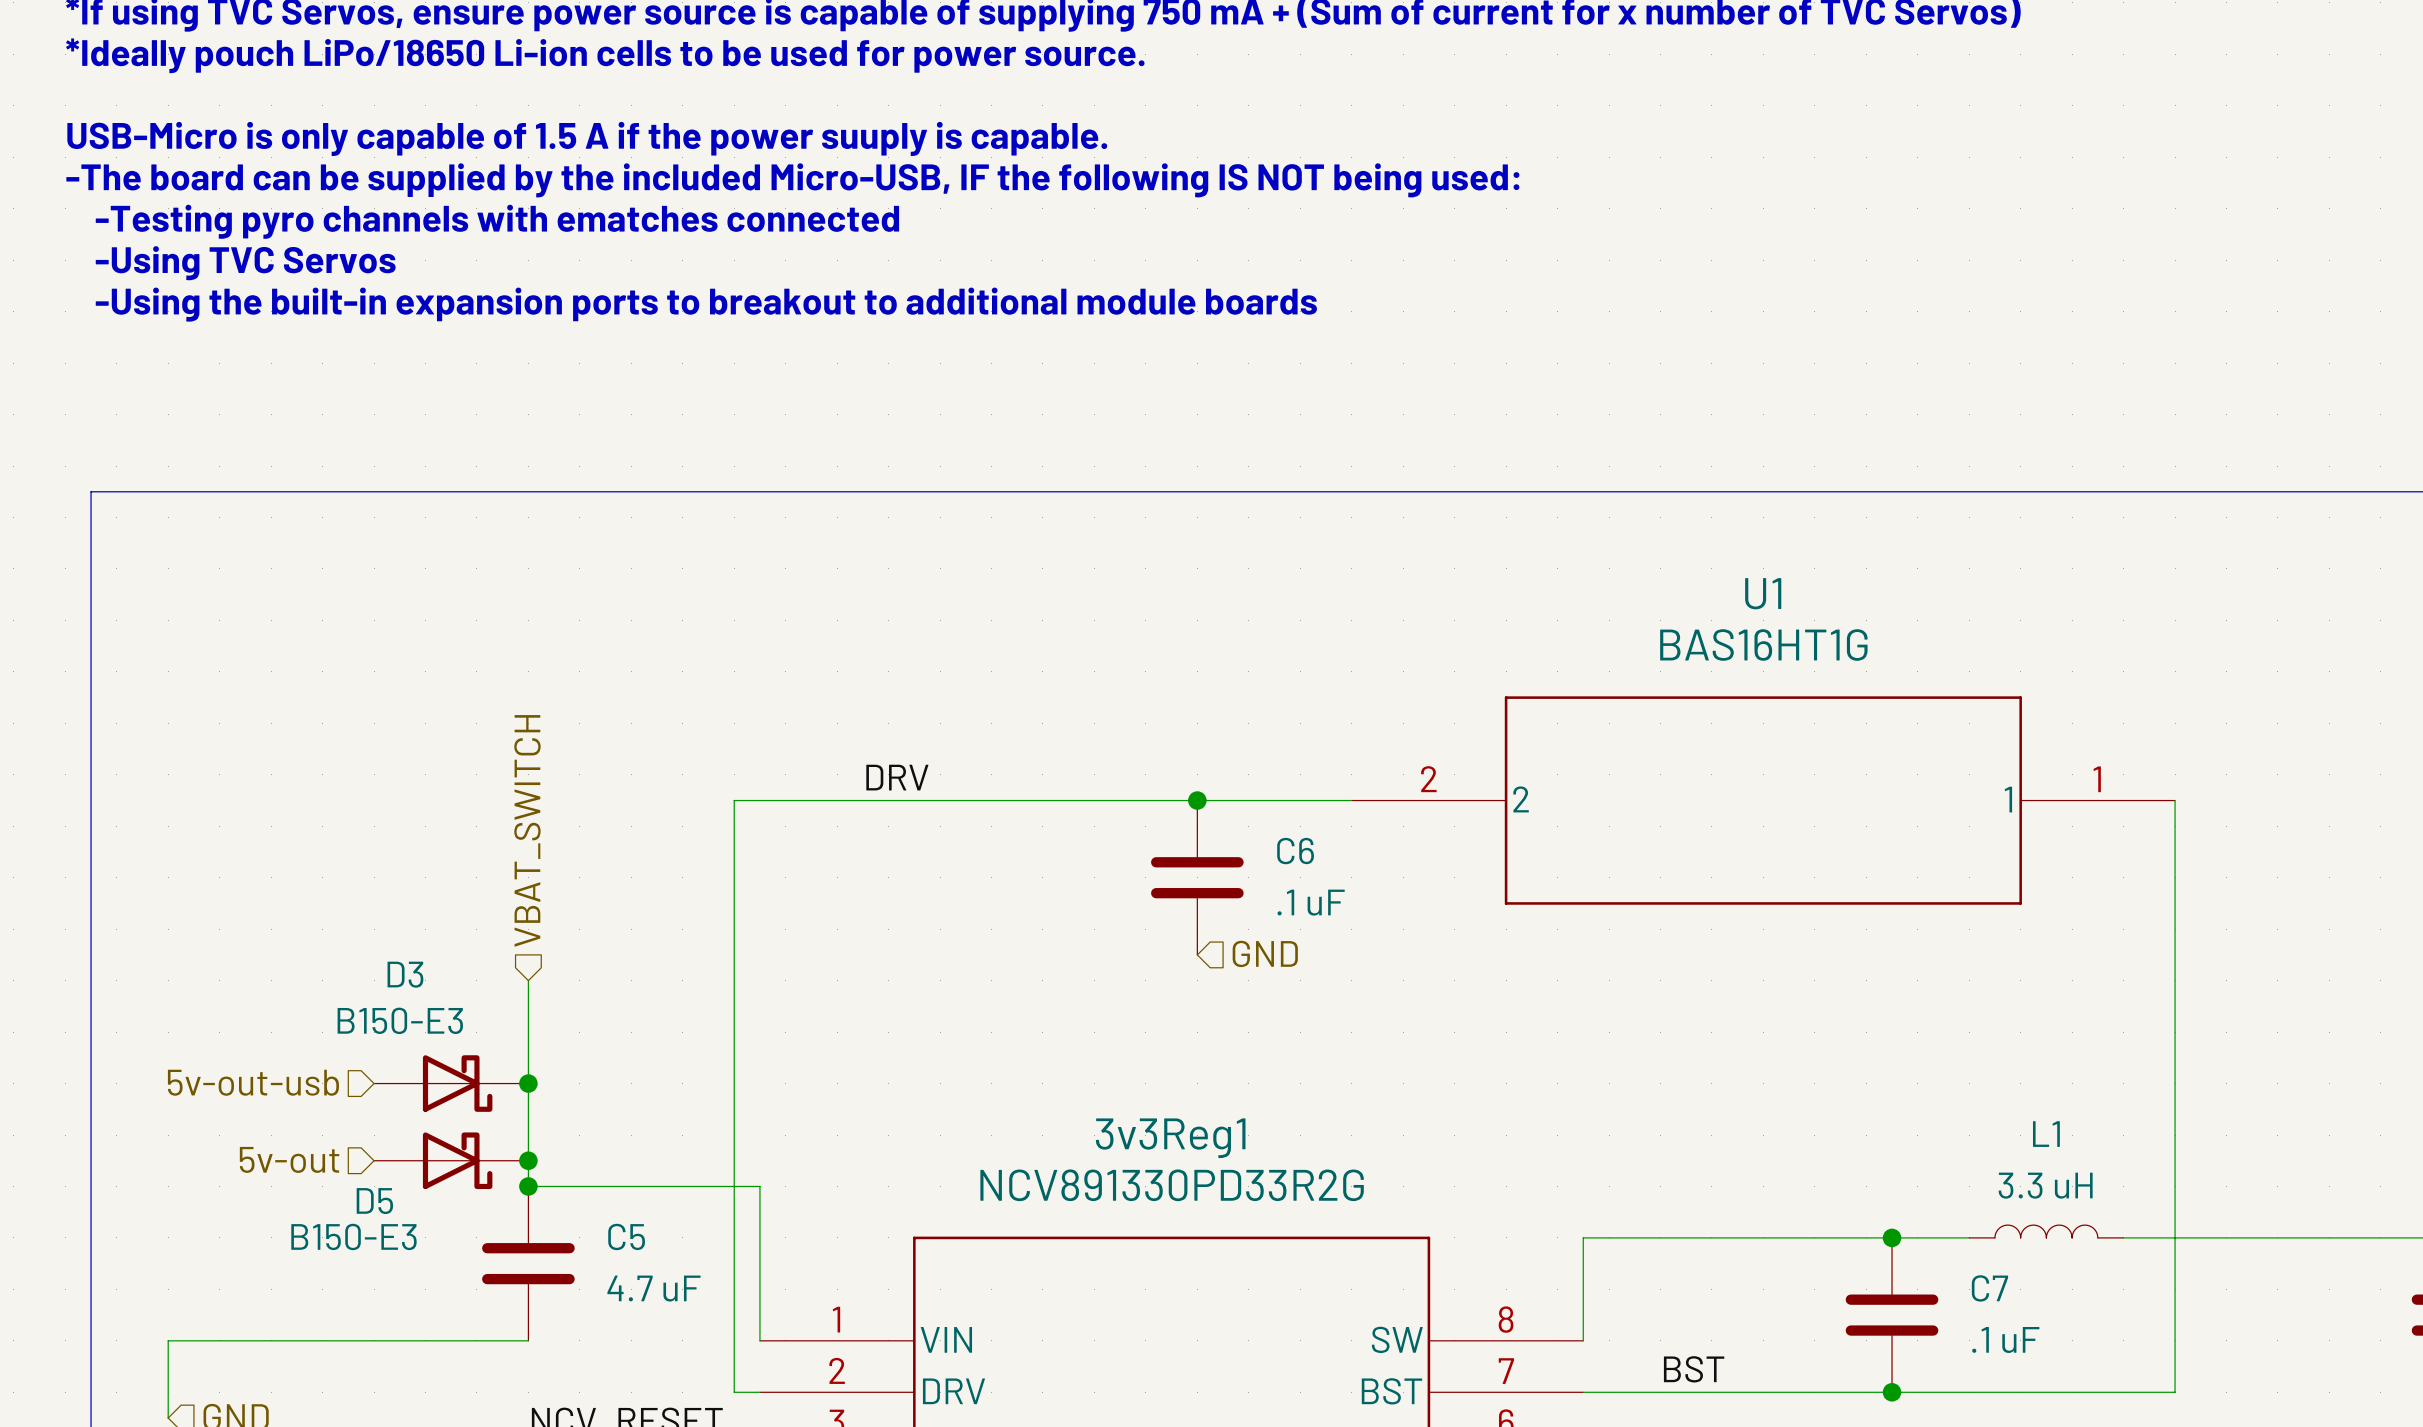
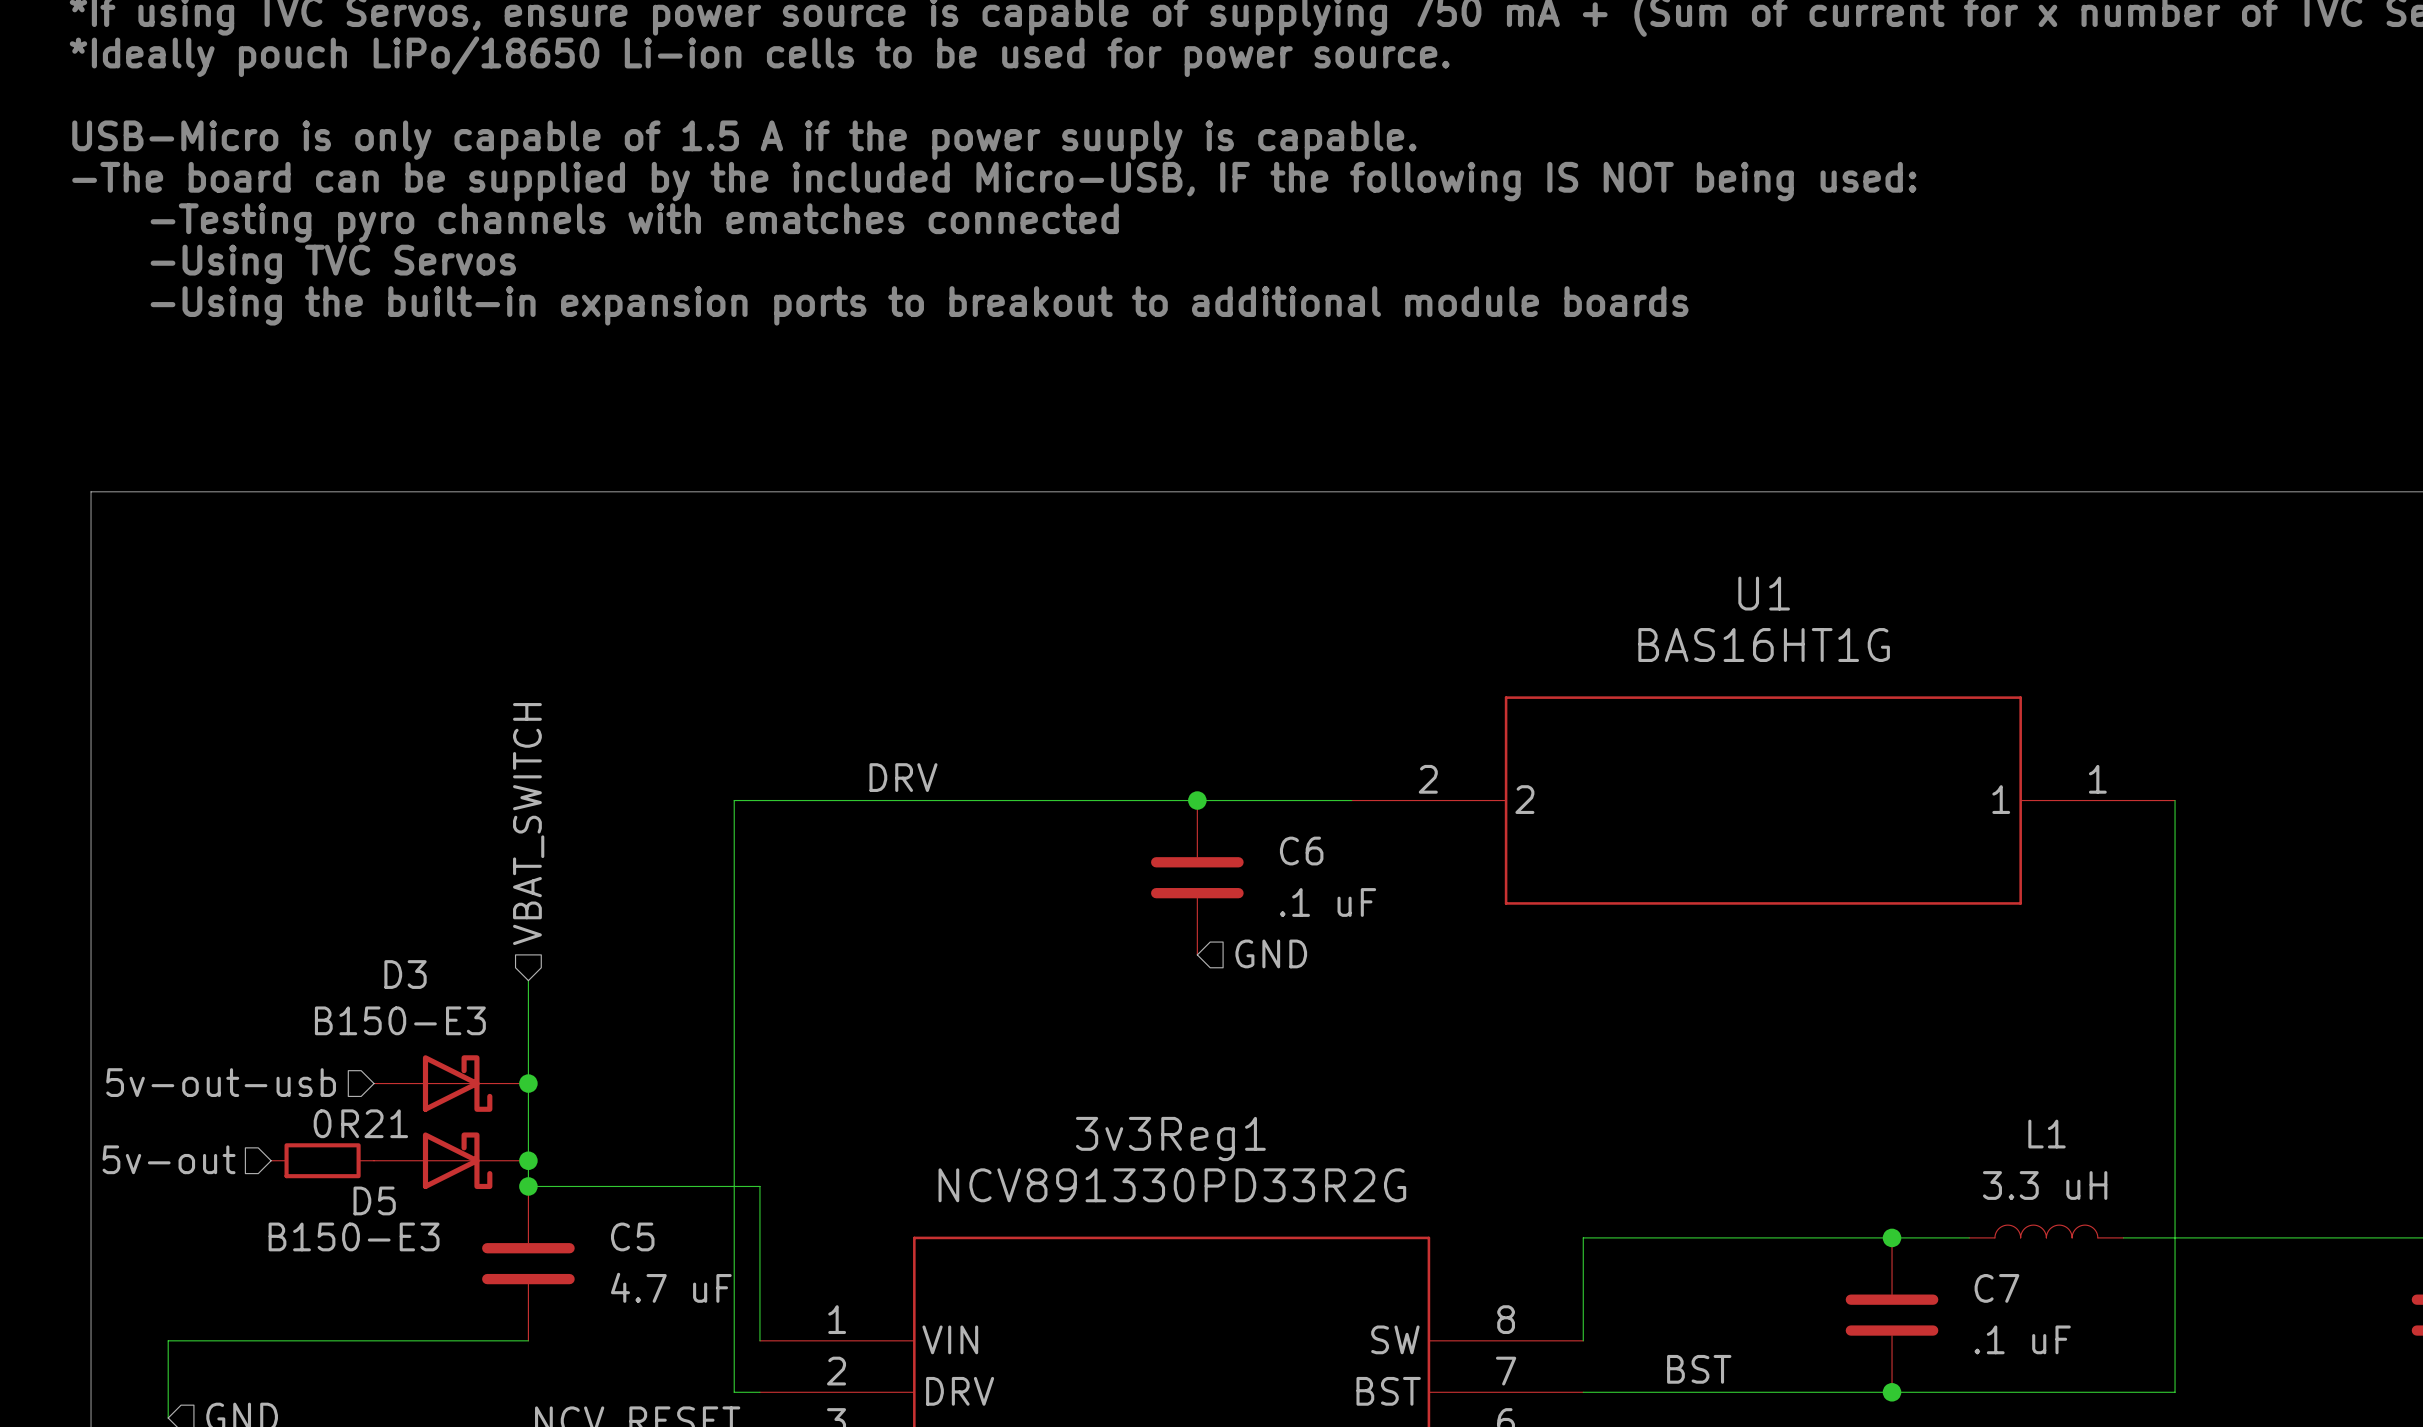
hierarchical label position: 5v-out (289, 1159) -> 5v-out (169, 1159)
R21: none -> 0 (322, 1160)

